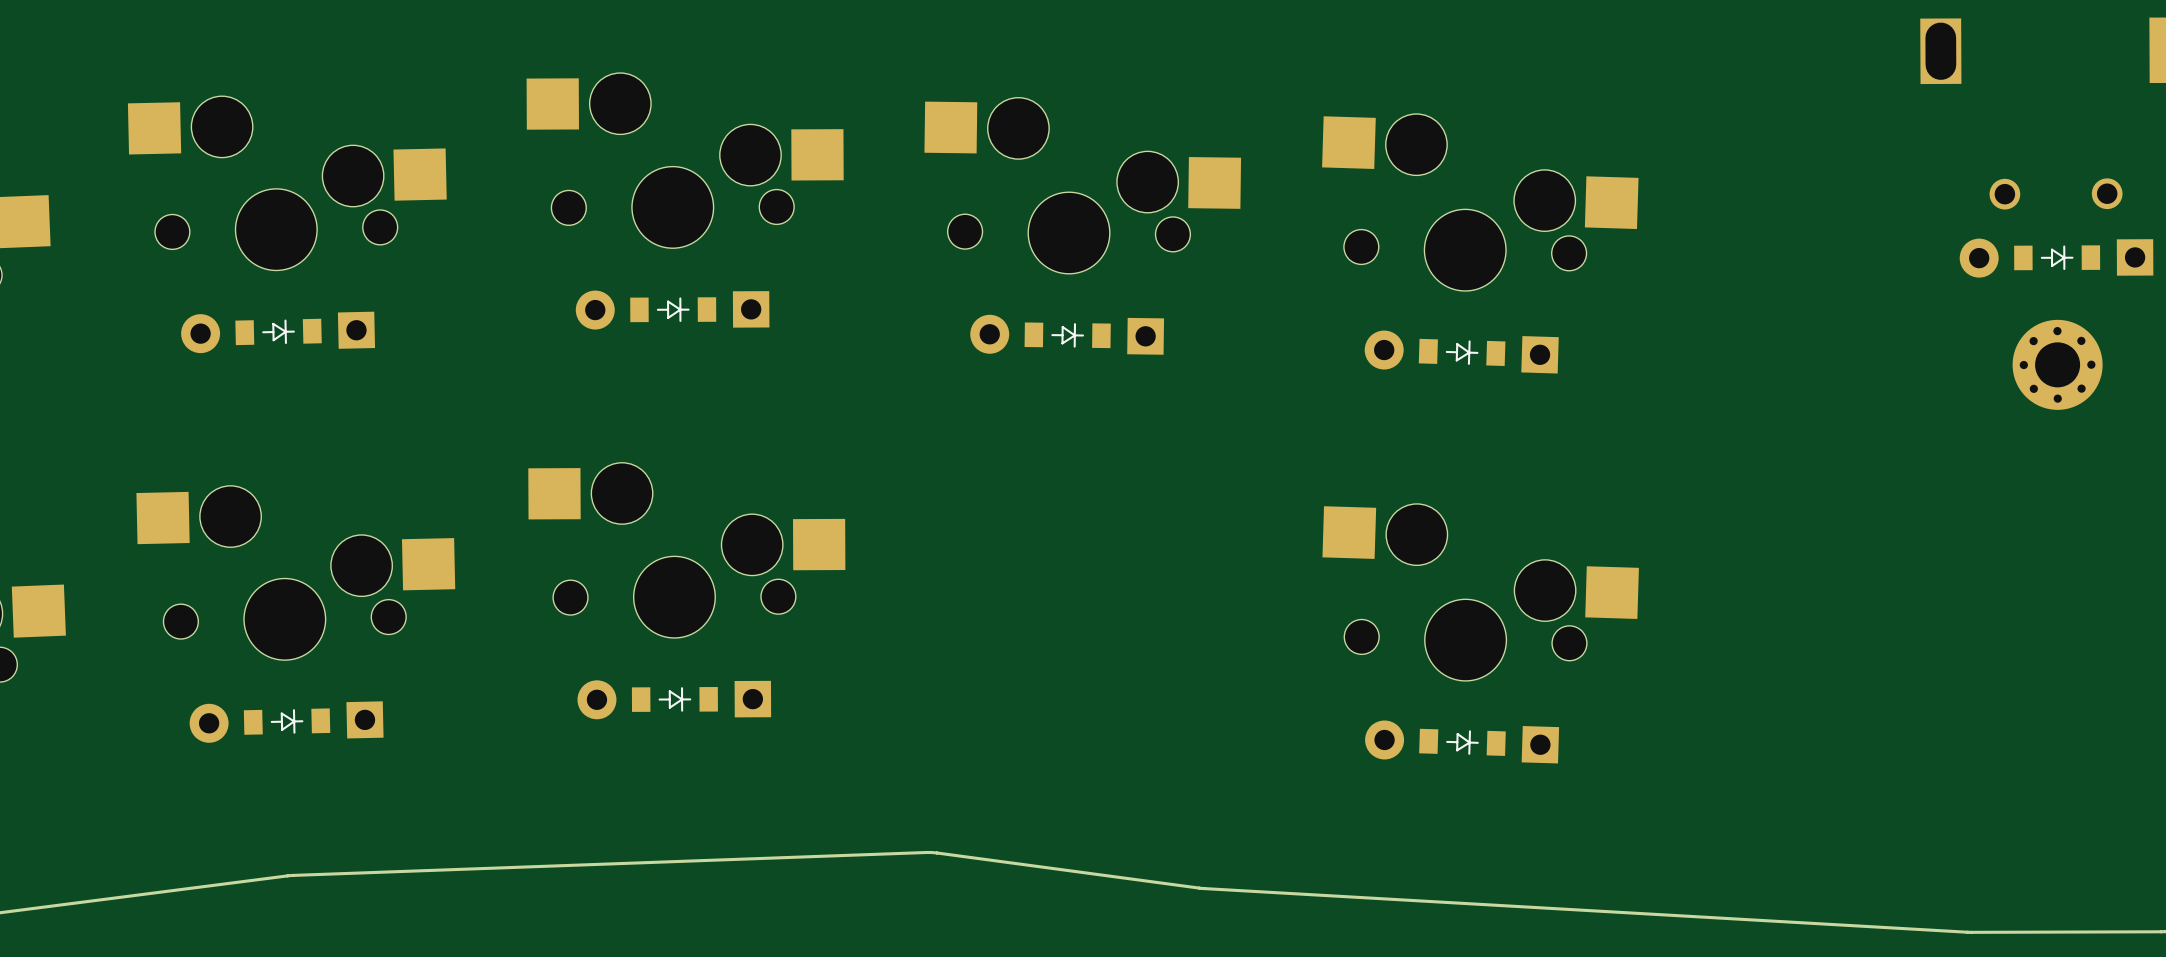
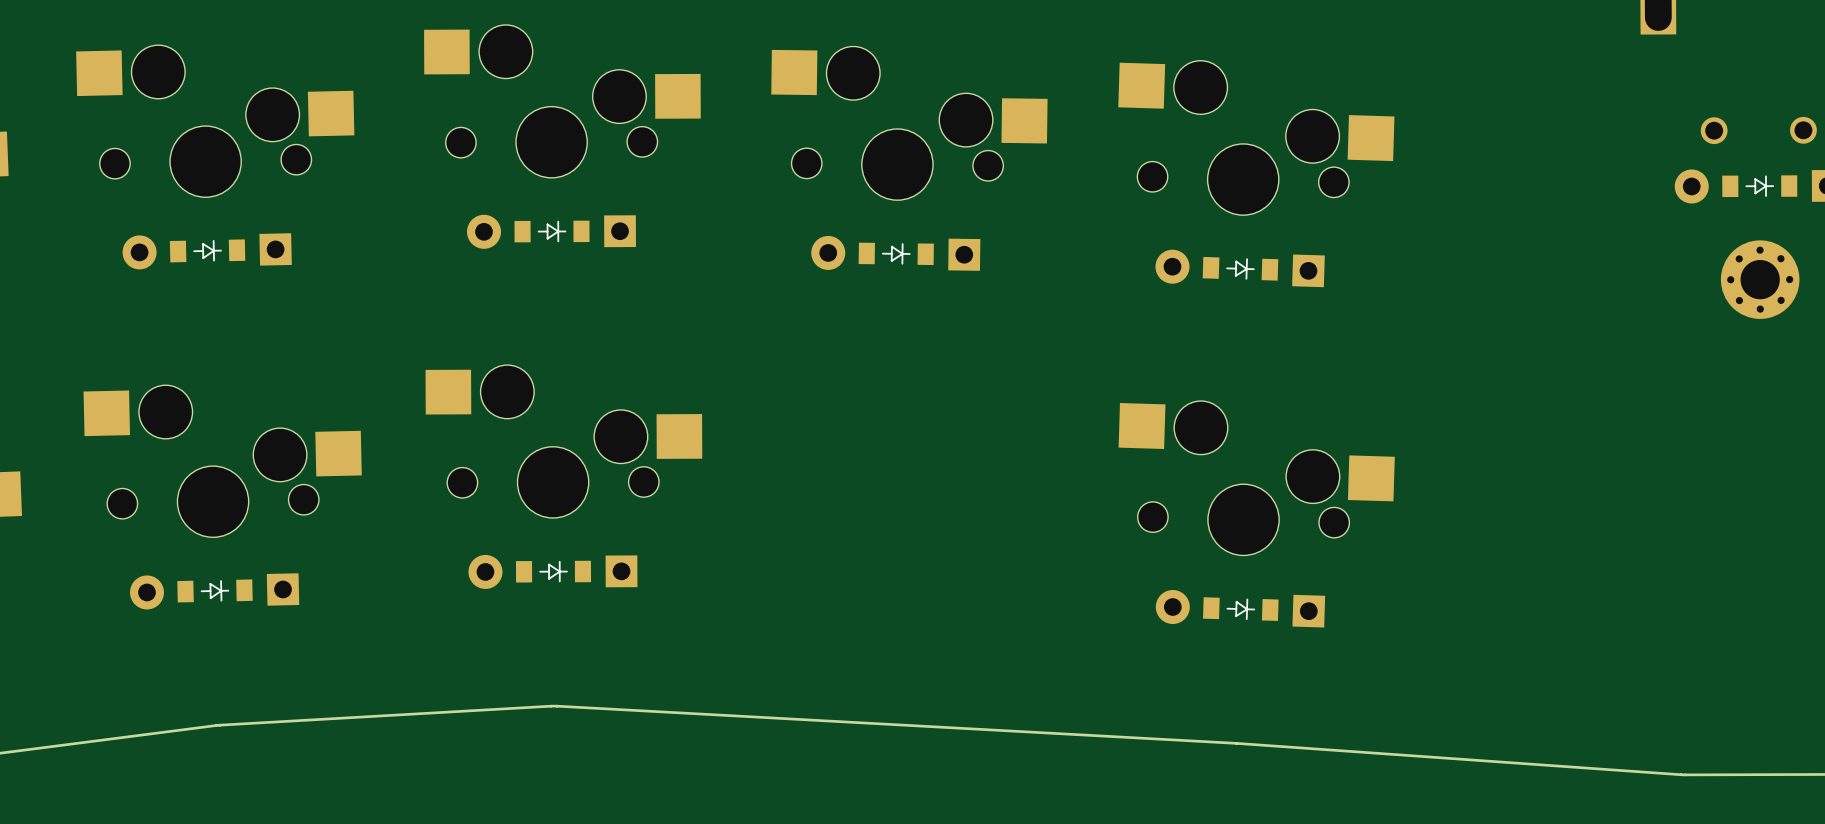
board edge: (287, 875) (931, 852) (1201, 888) (1971, 932) -> (215, 725) (557, 706) (1236, 743) (1685, 774)

